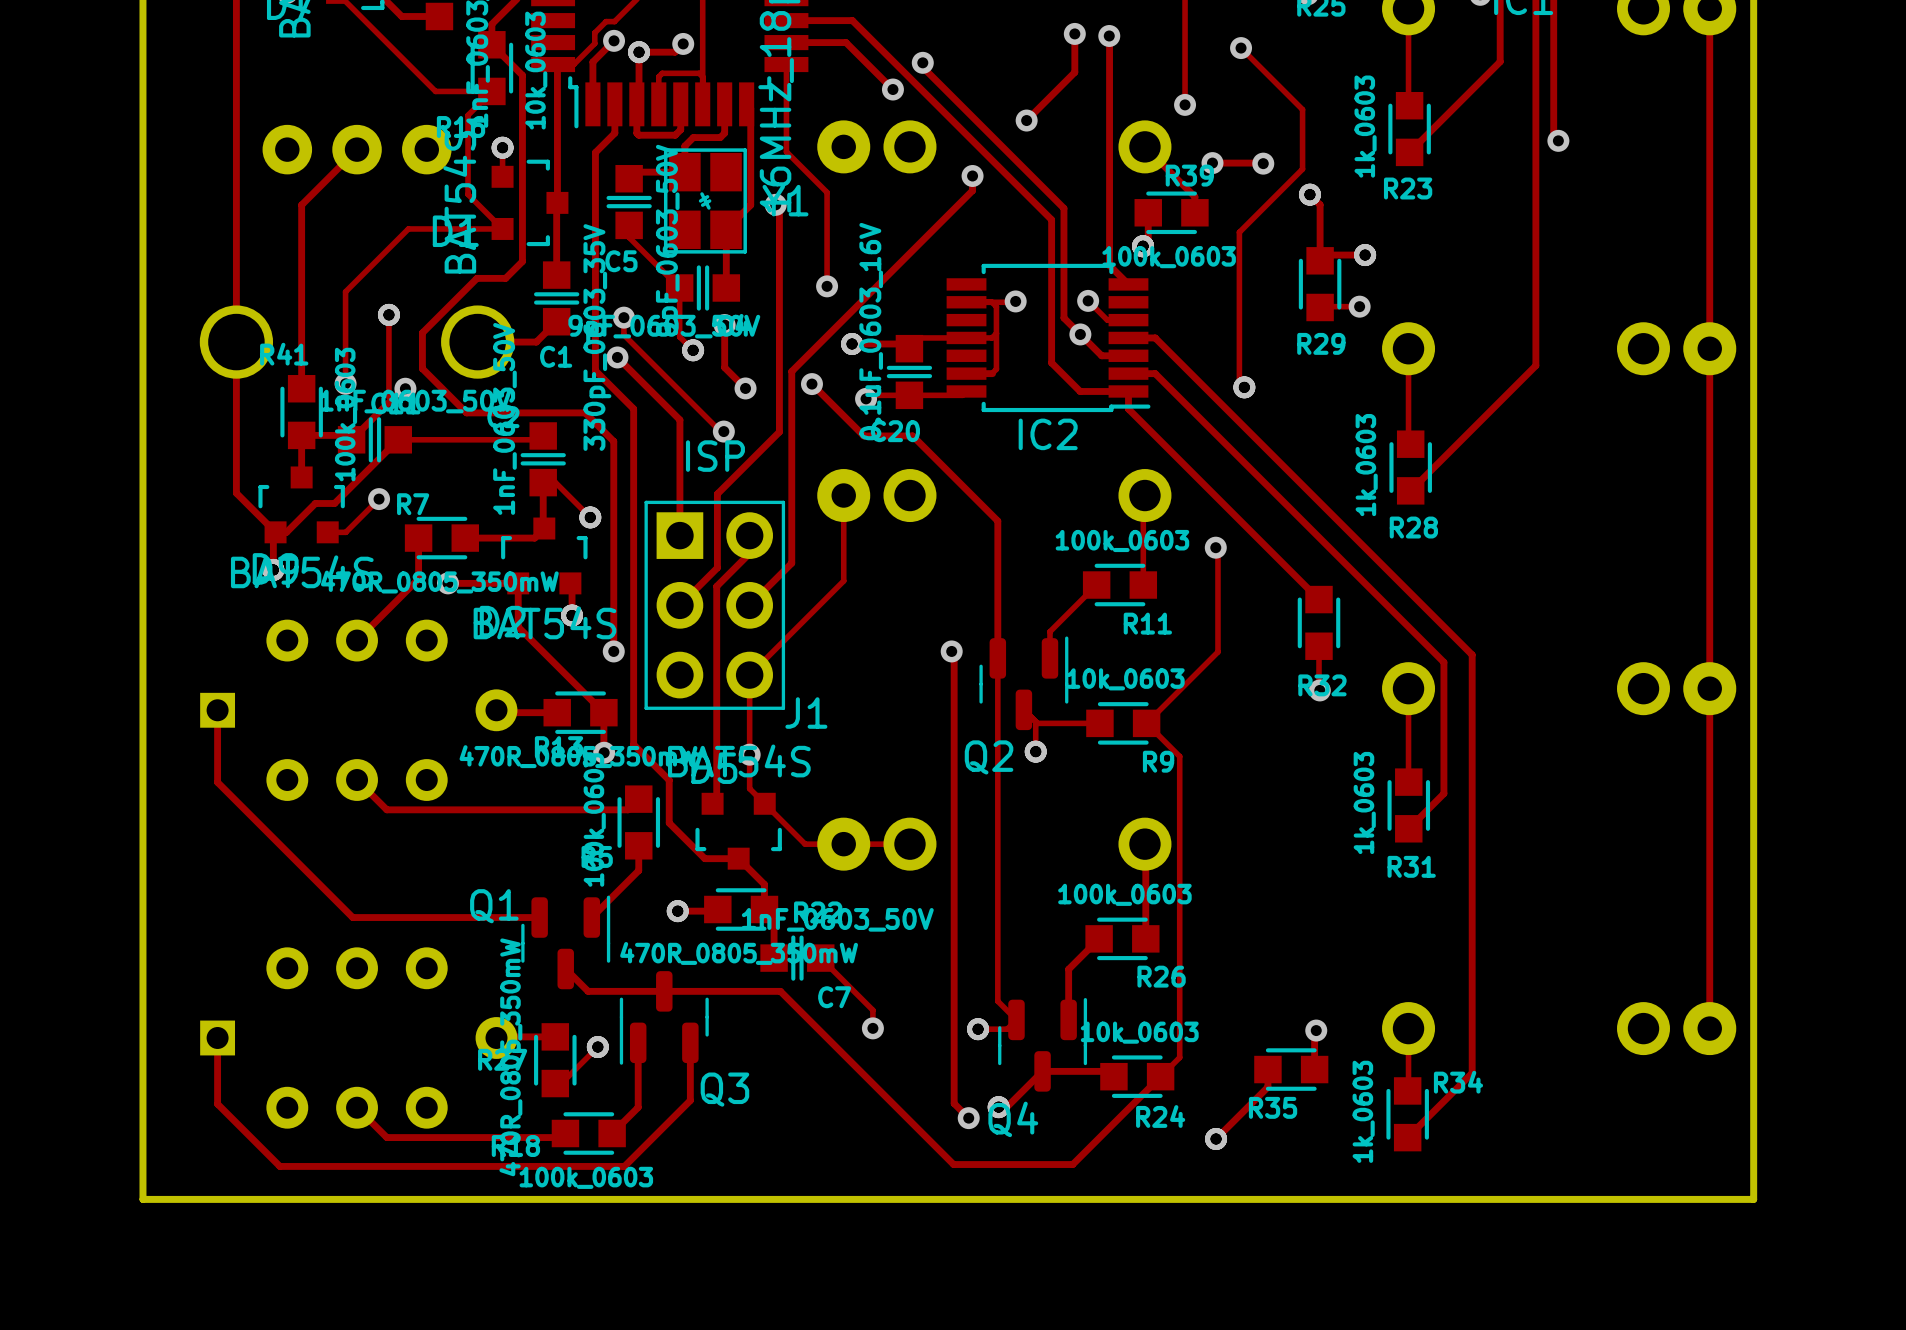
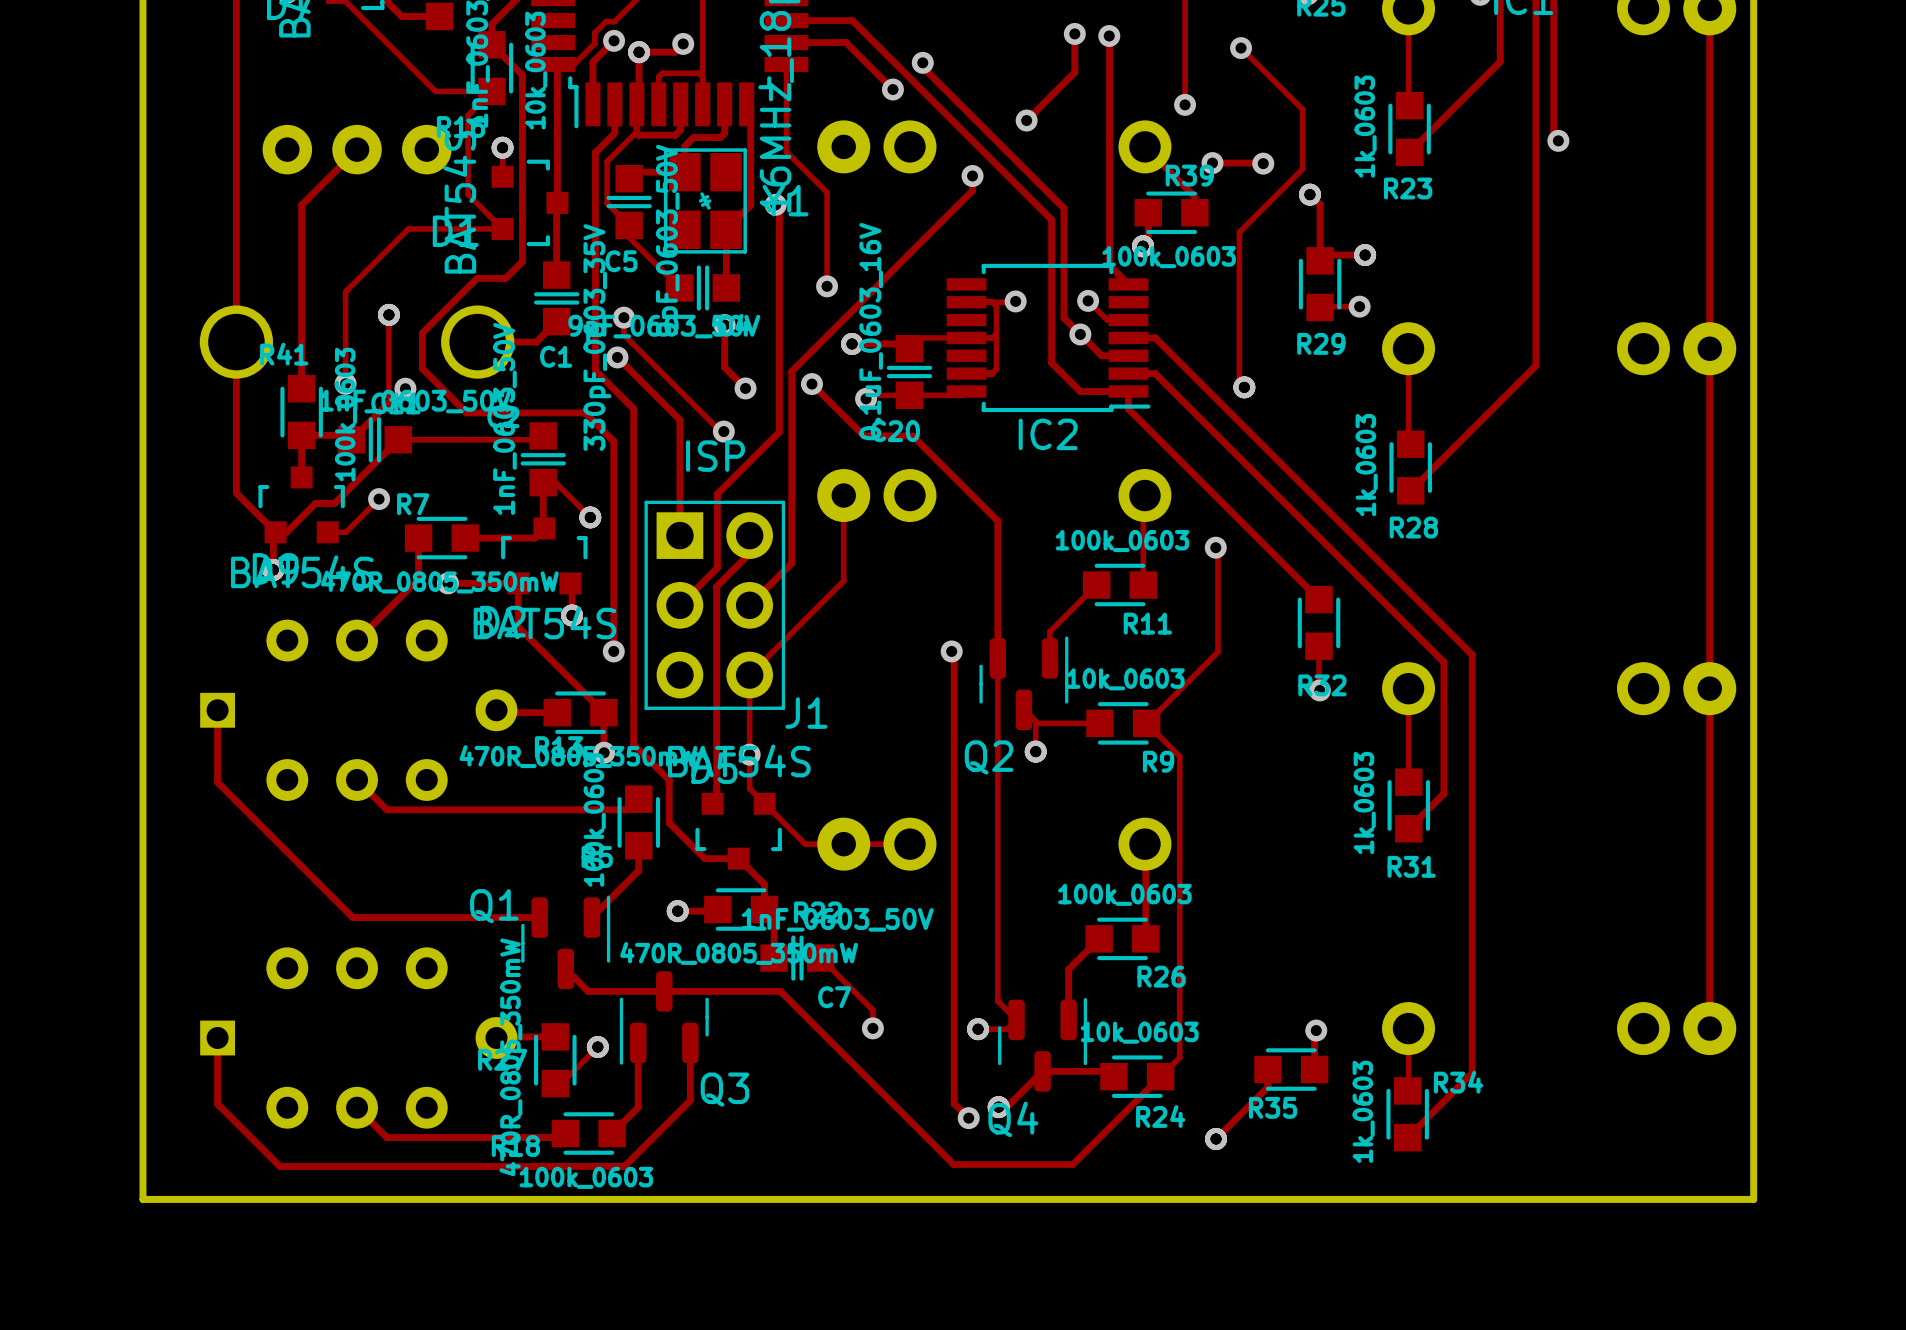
track: none -> (636, 133) (607, 161) (607, 203) (629, 225)
track: (679, 287) (679, 336) (693, 350) -> none
via: (693, 350) -> none

